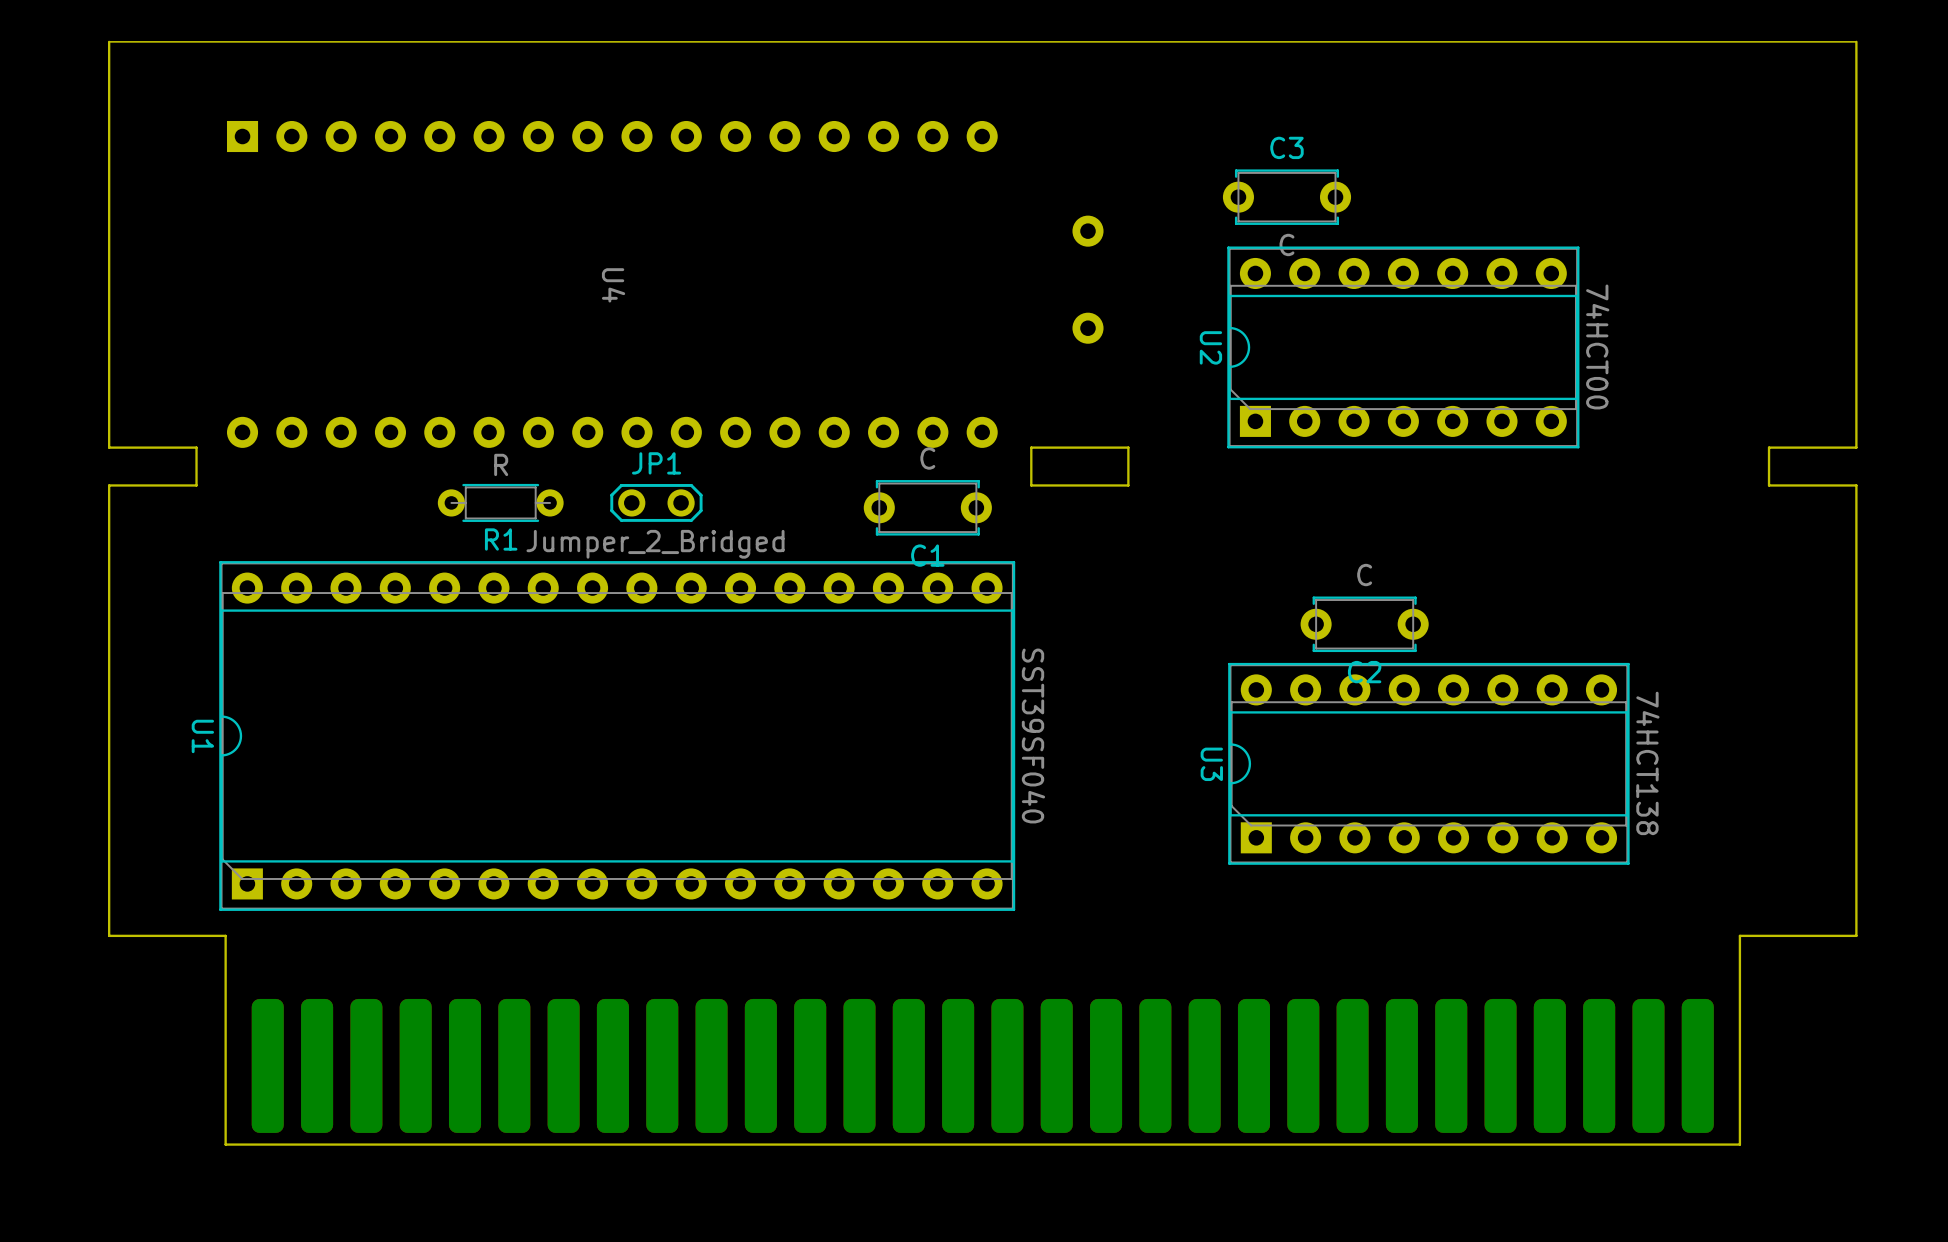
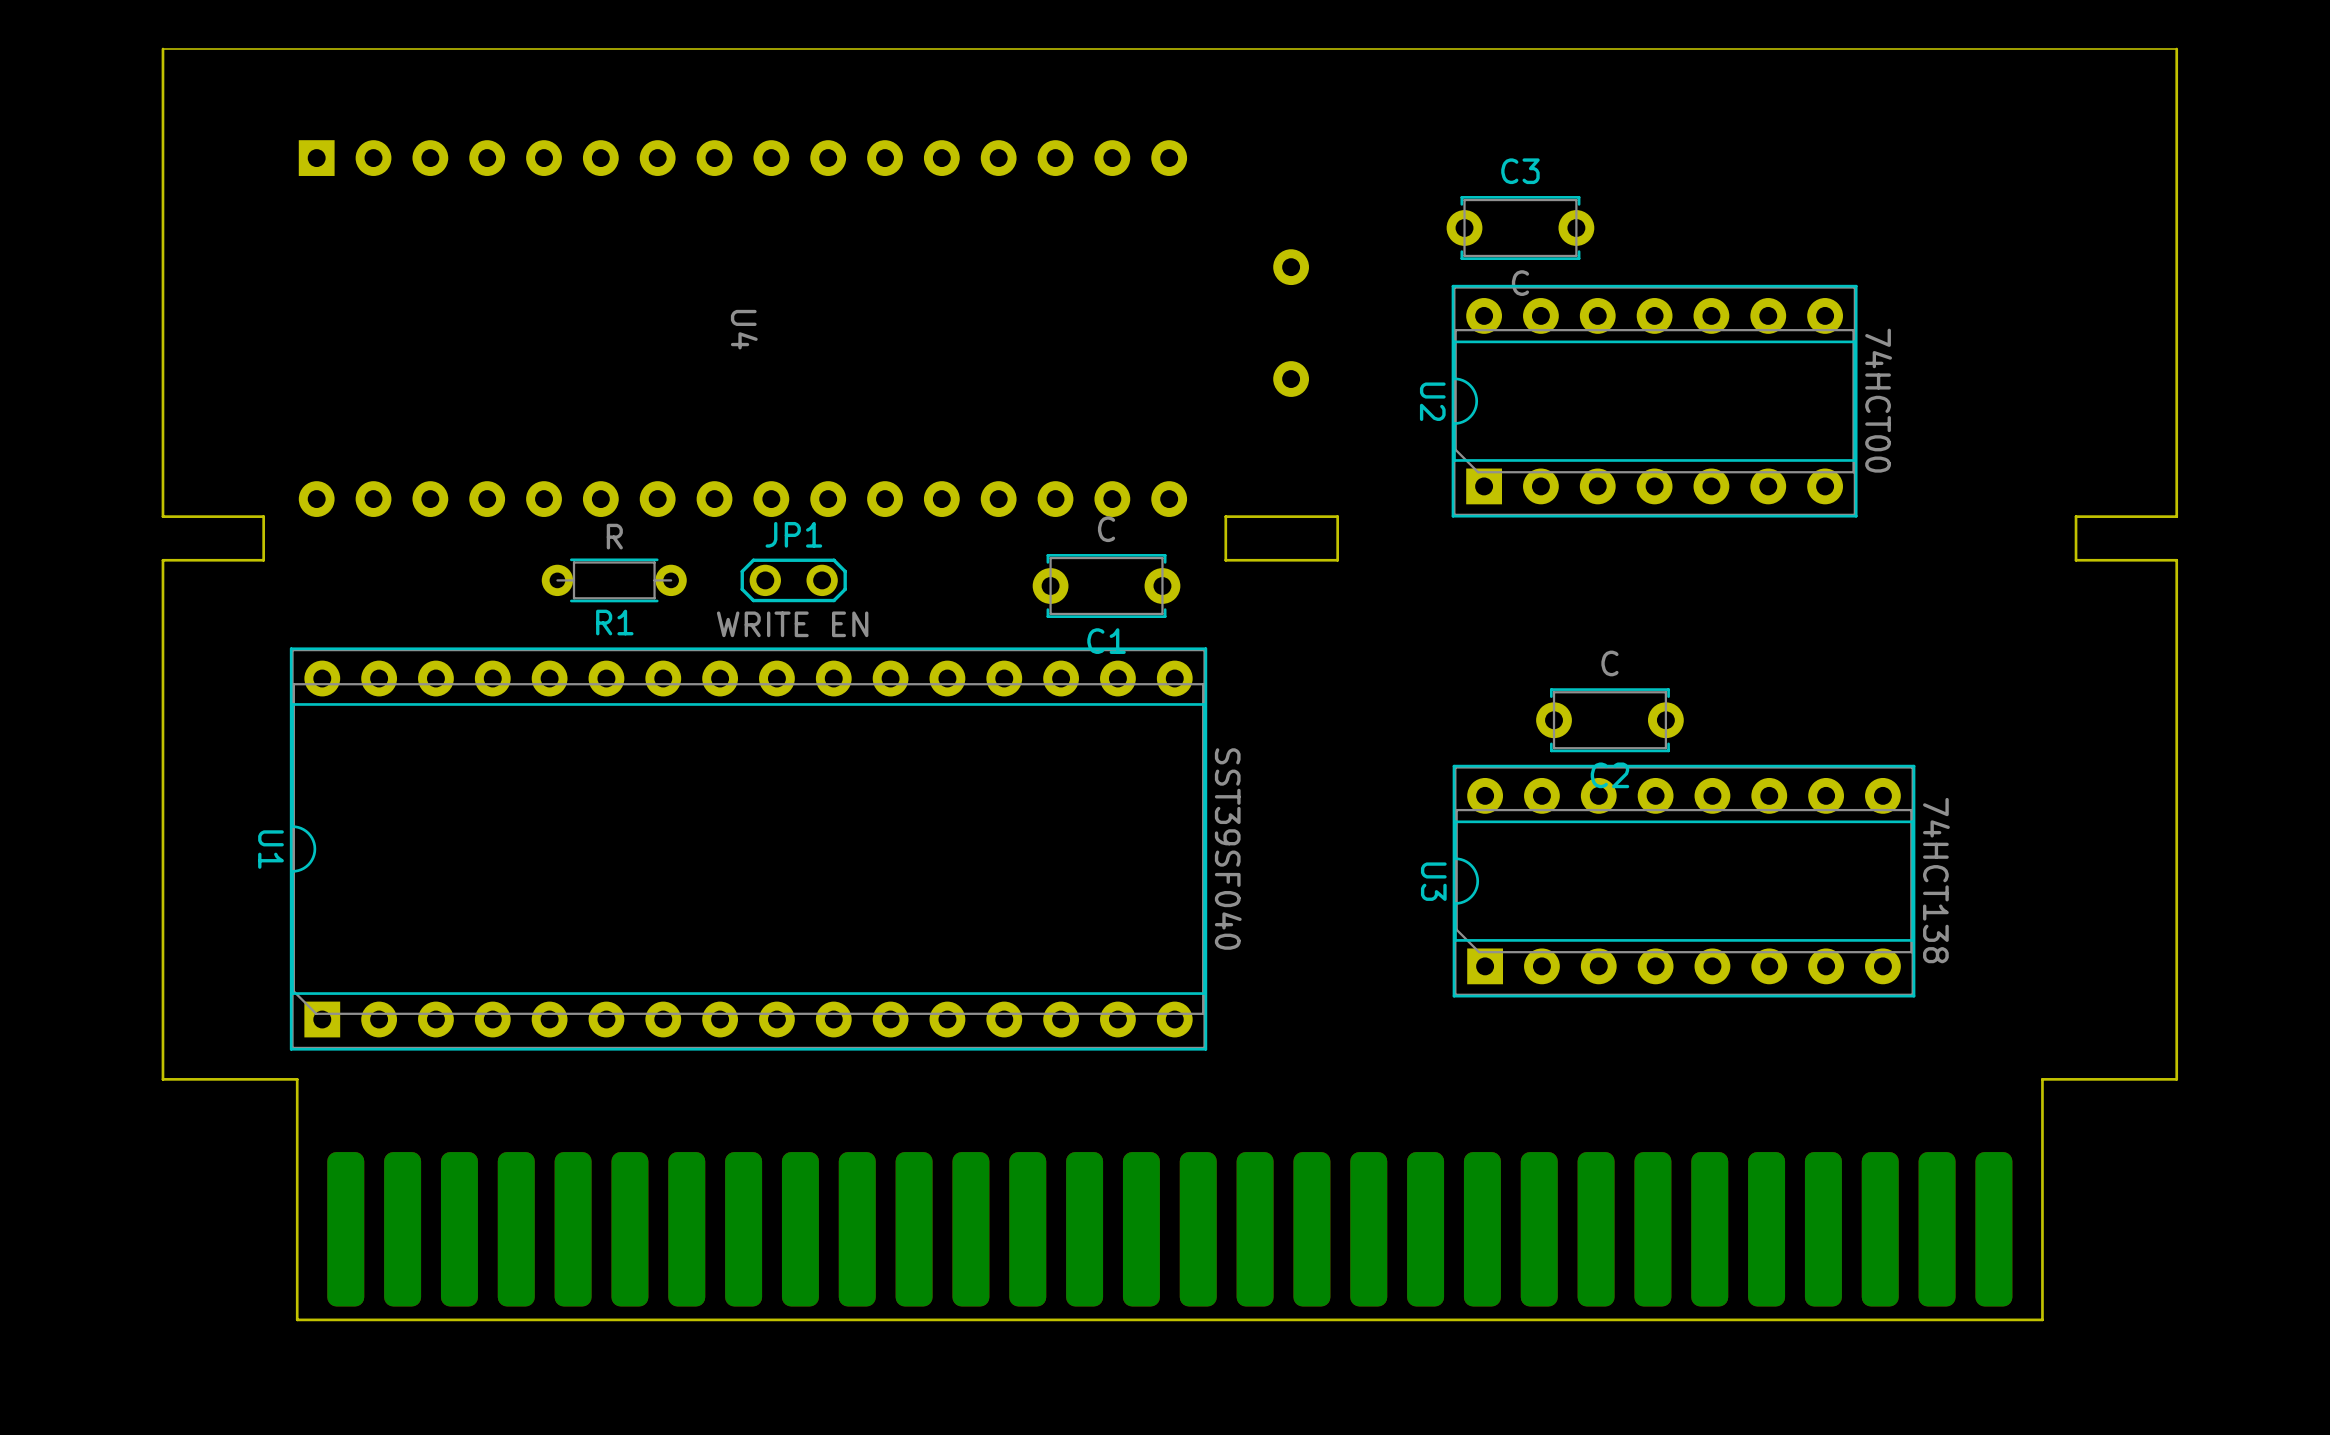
JP1 value: Jumper_2_Bridged (655, 544) -> WRITE EN (792, 624)

